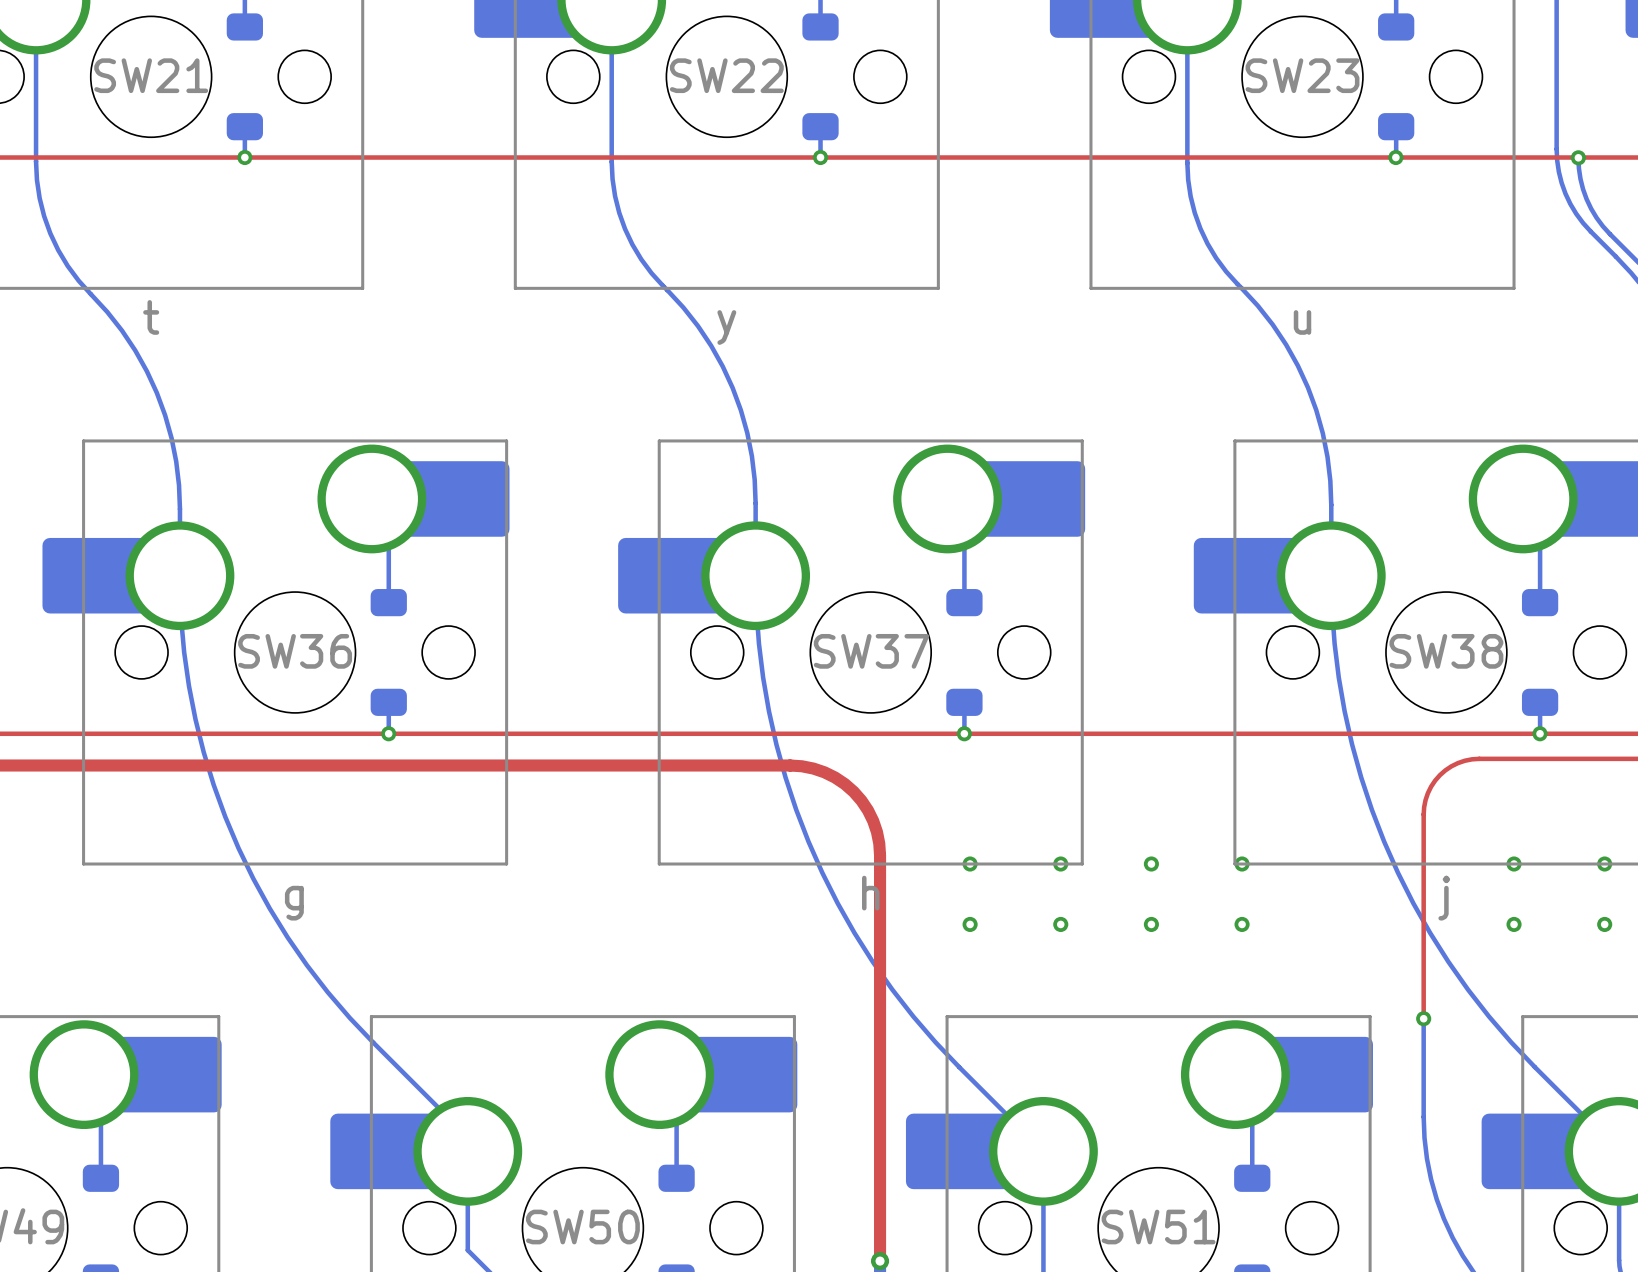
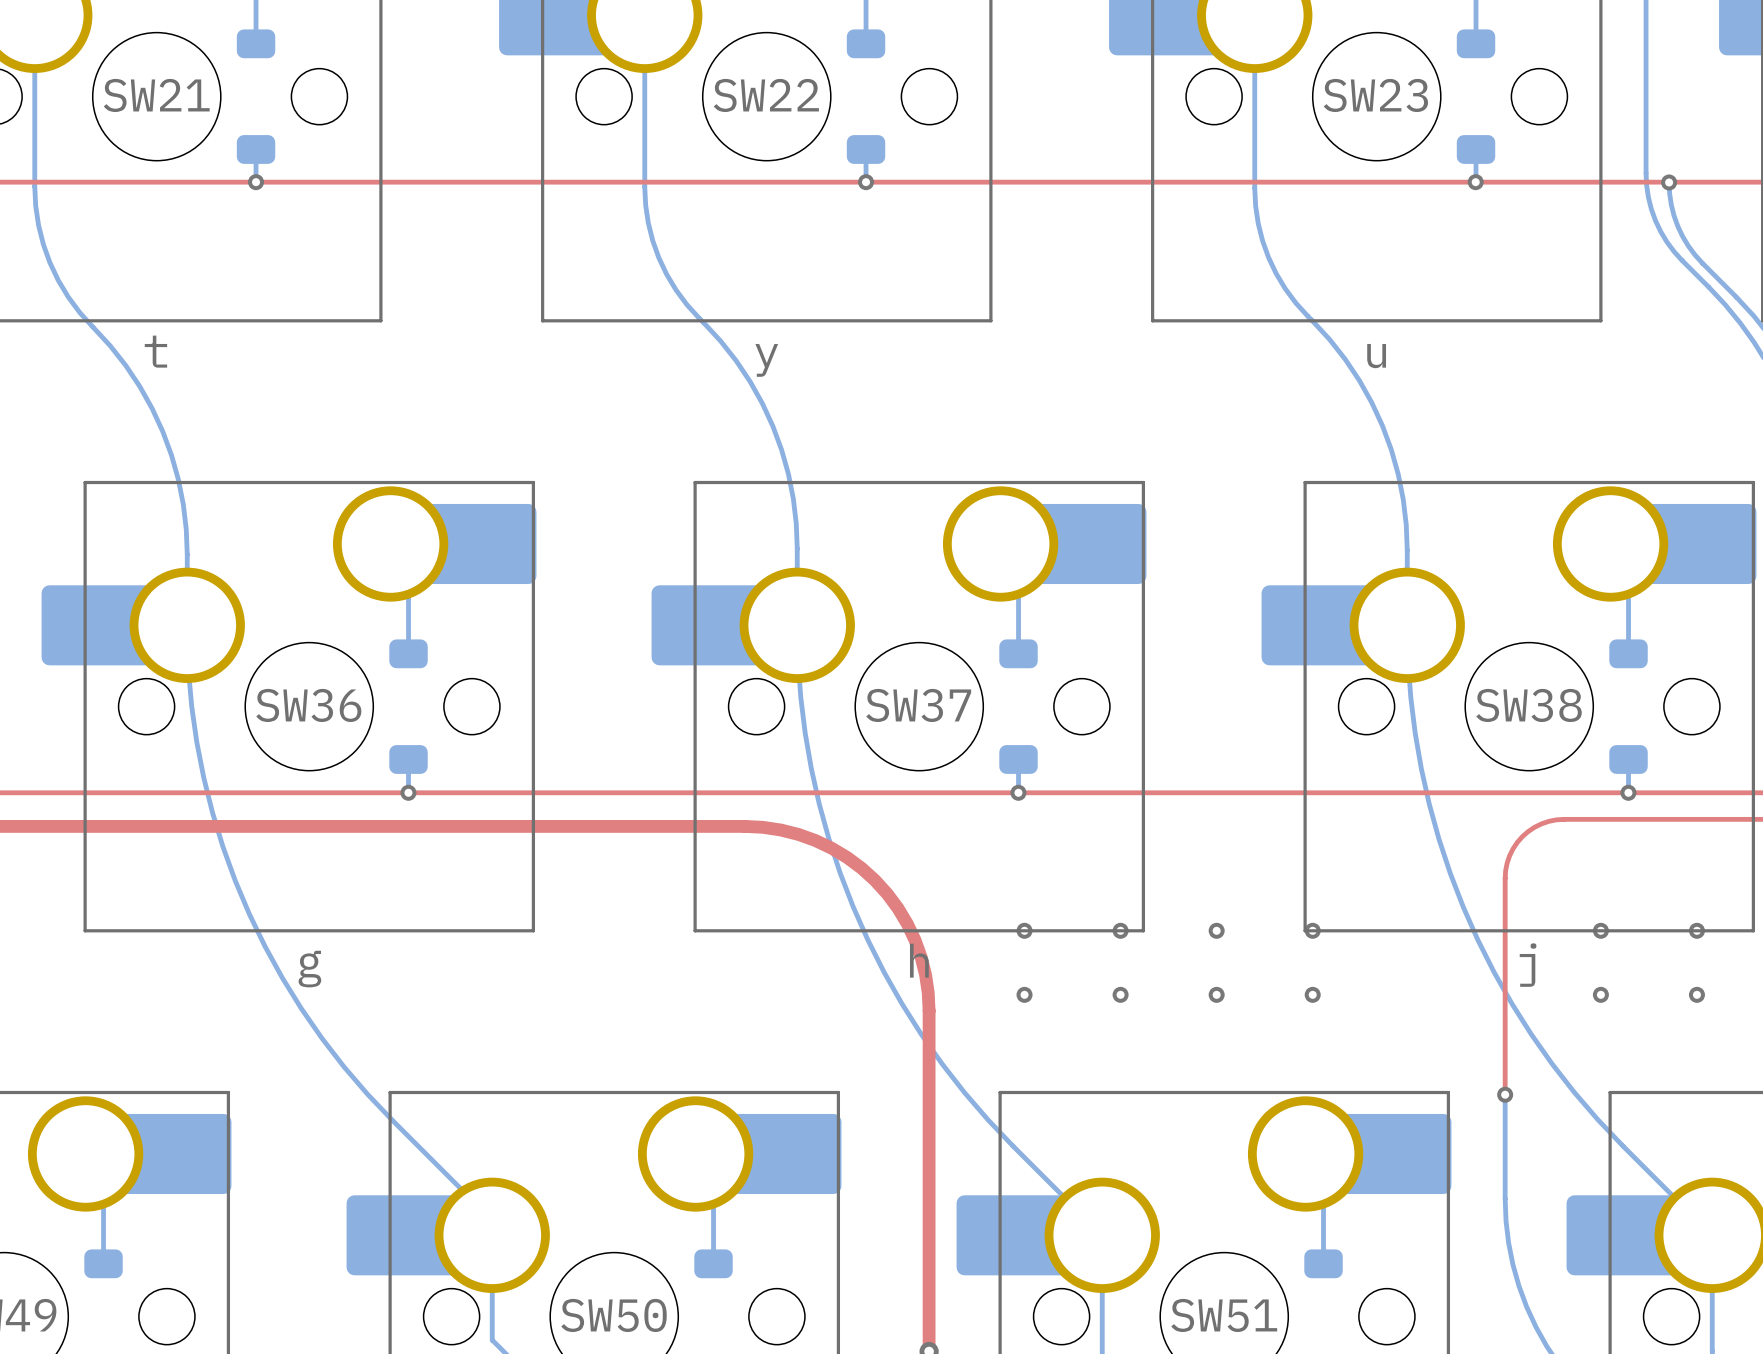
top track: (705, 765) (801, 766) (824, 772) (844, 784) (853, 791) (868, 810) (873, 820) (879, 843) (880, 939) -> (744, 826) (780, 829) (815, 840) (847, 857) (875, 880) (898, 908) (915, 940) (925, 974) (929, 1010)

